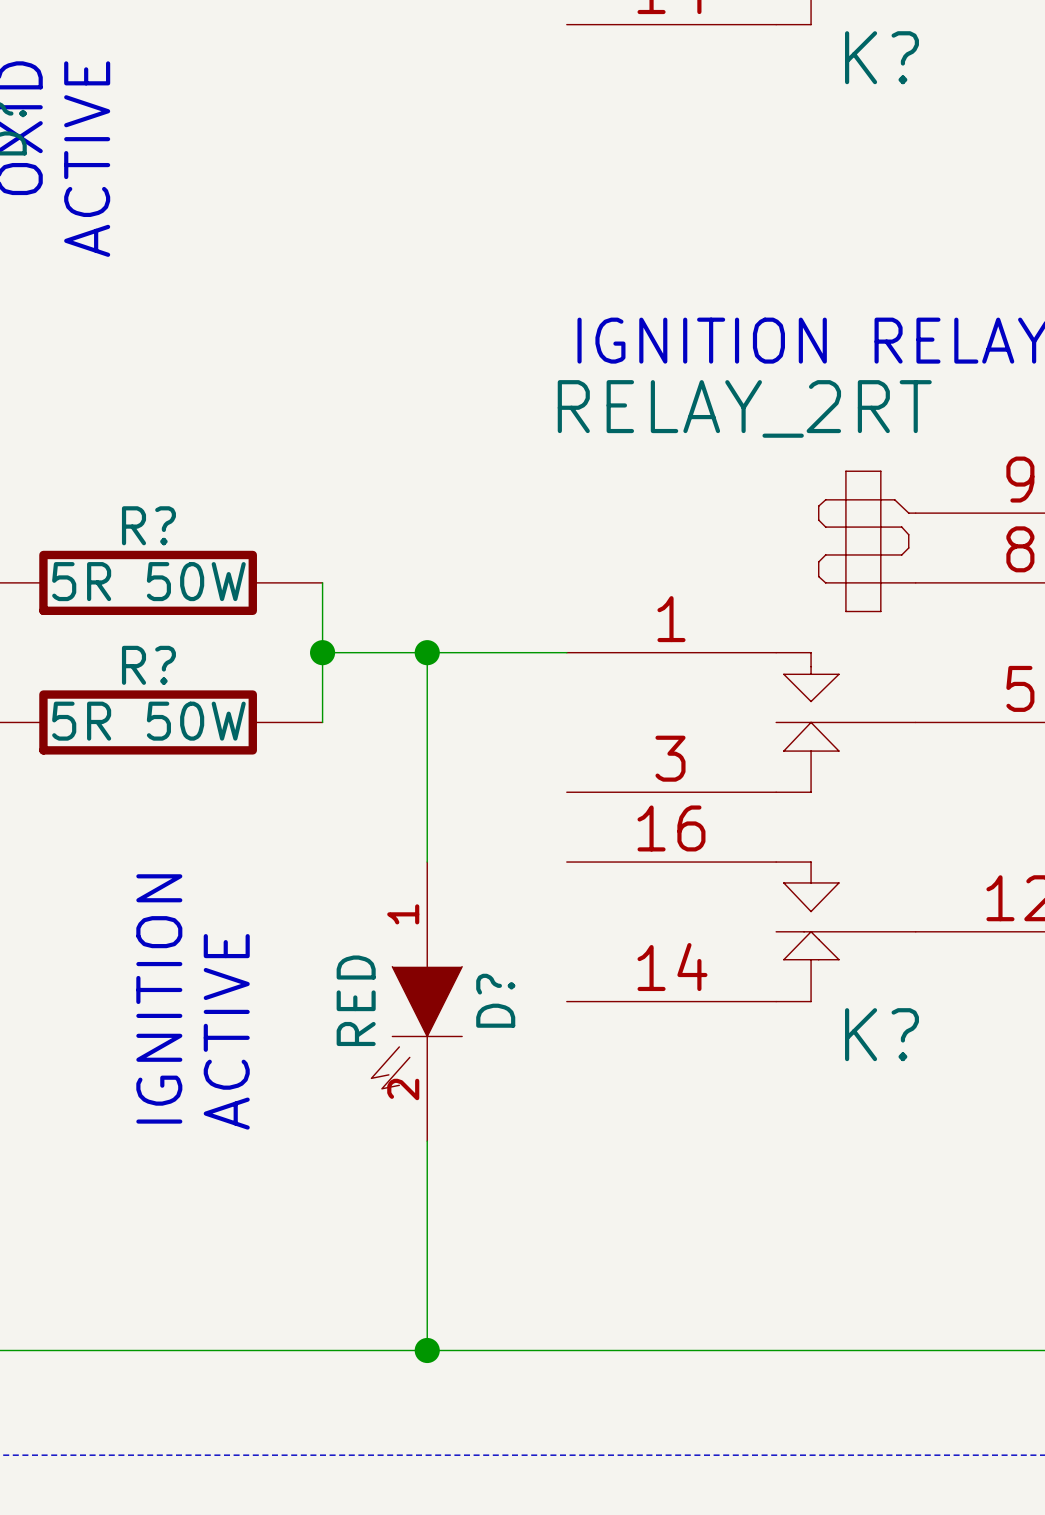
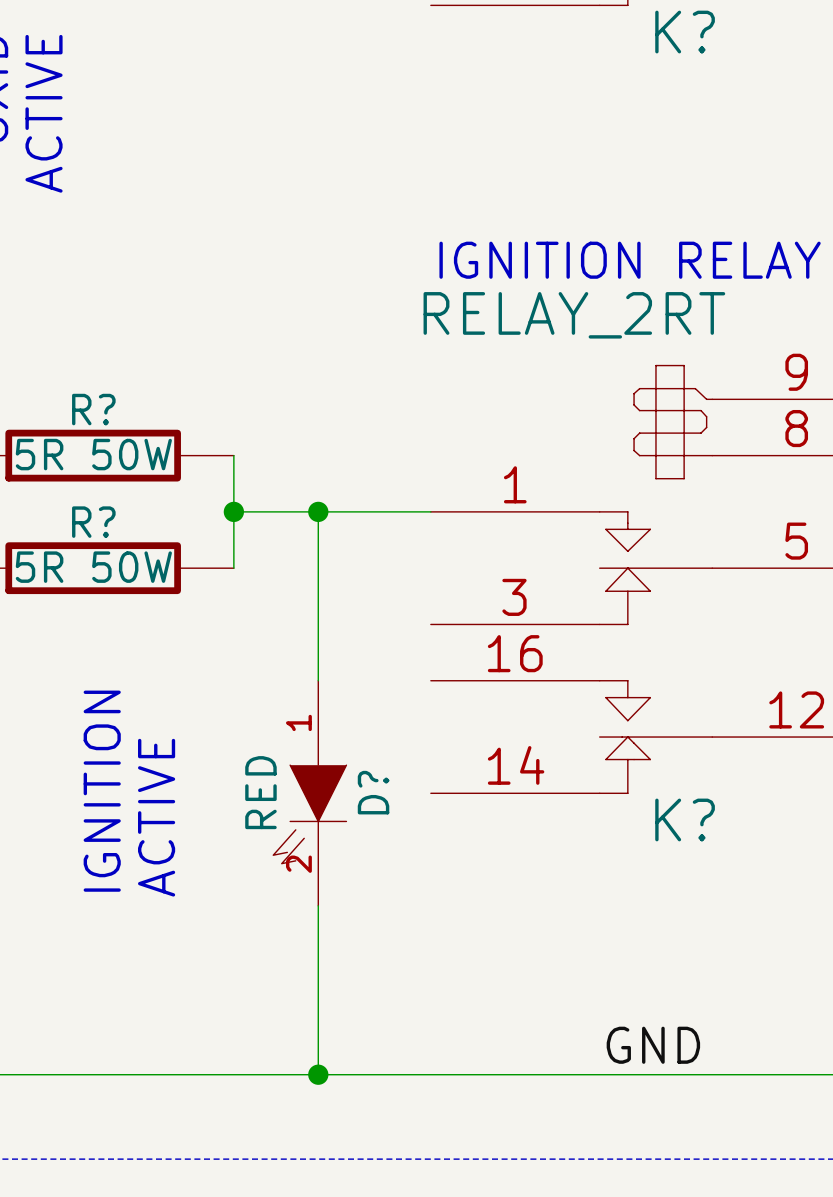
label: none -> GND (653, 1045)

